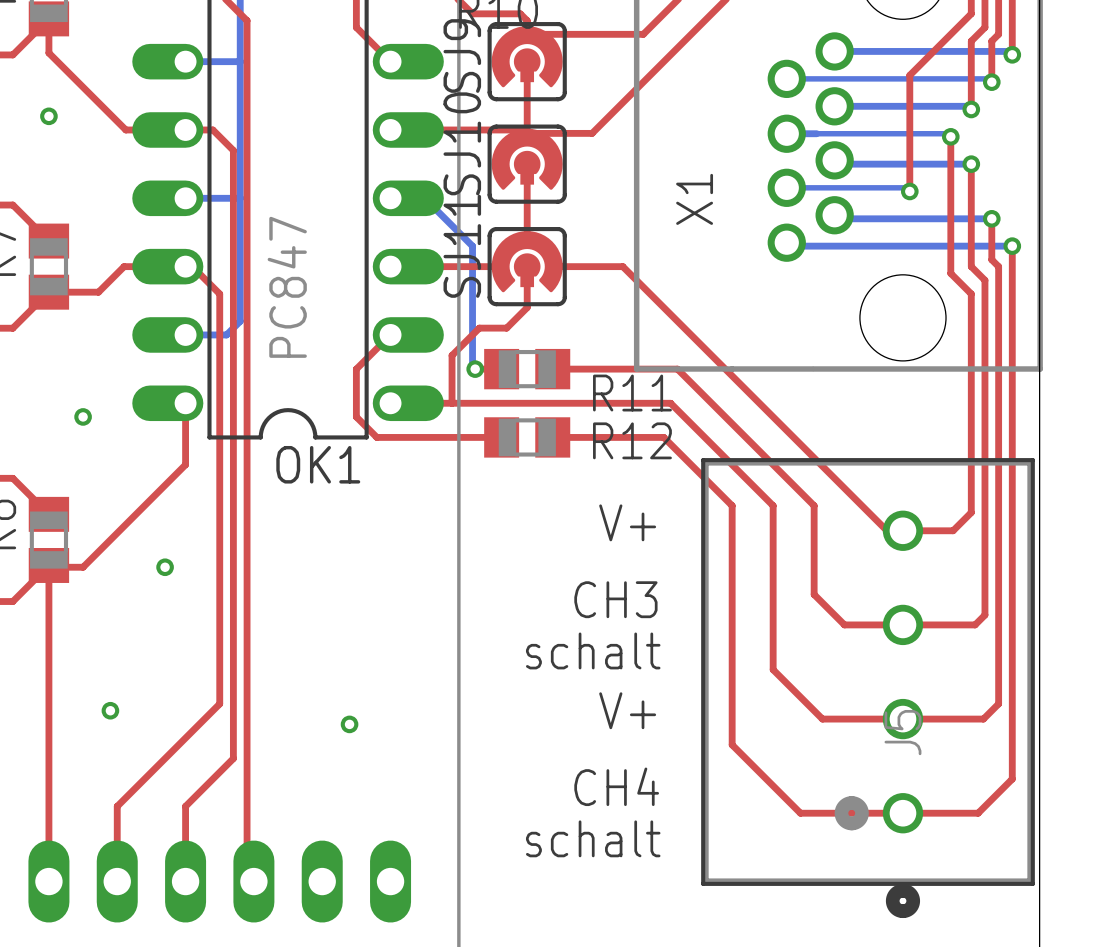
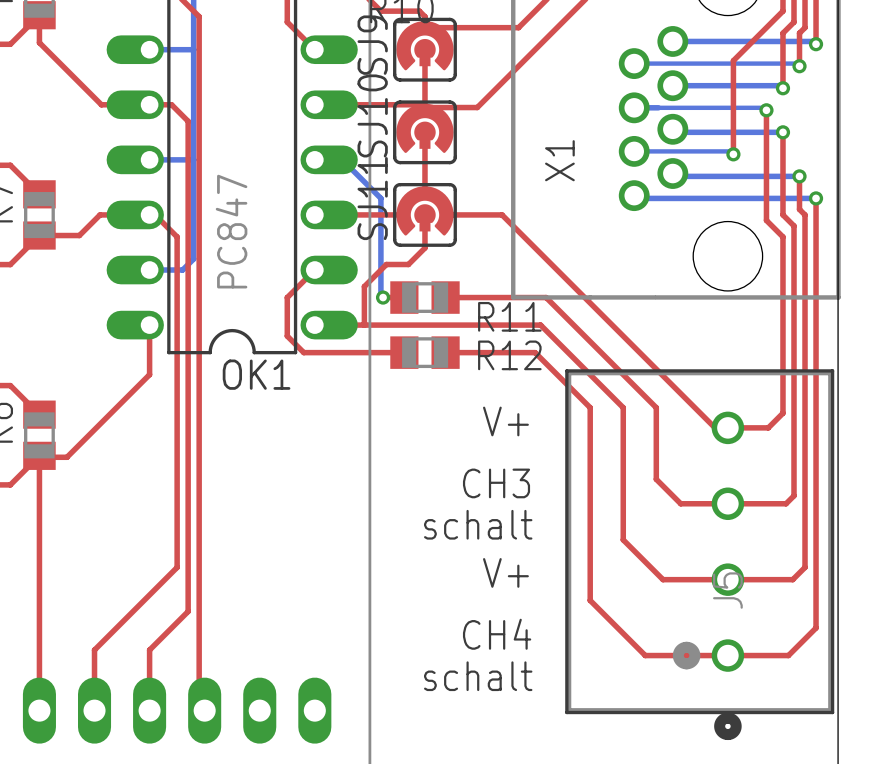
via: (48, 116) -> none
via: (83, 416) -> none
via: (165, 567) -> none
via: (110, 710) -> none
via: (349, 724) -> none

